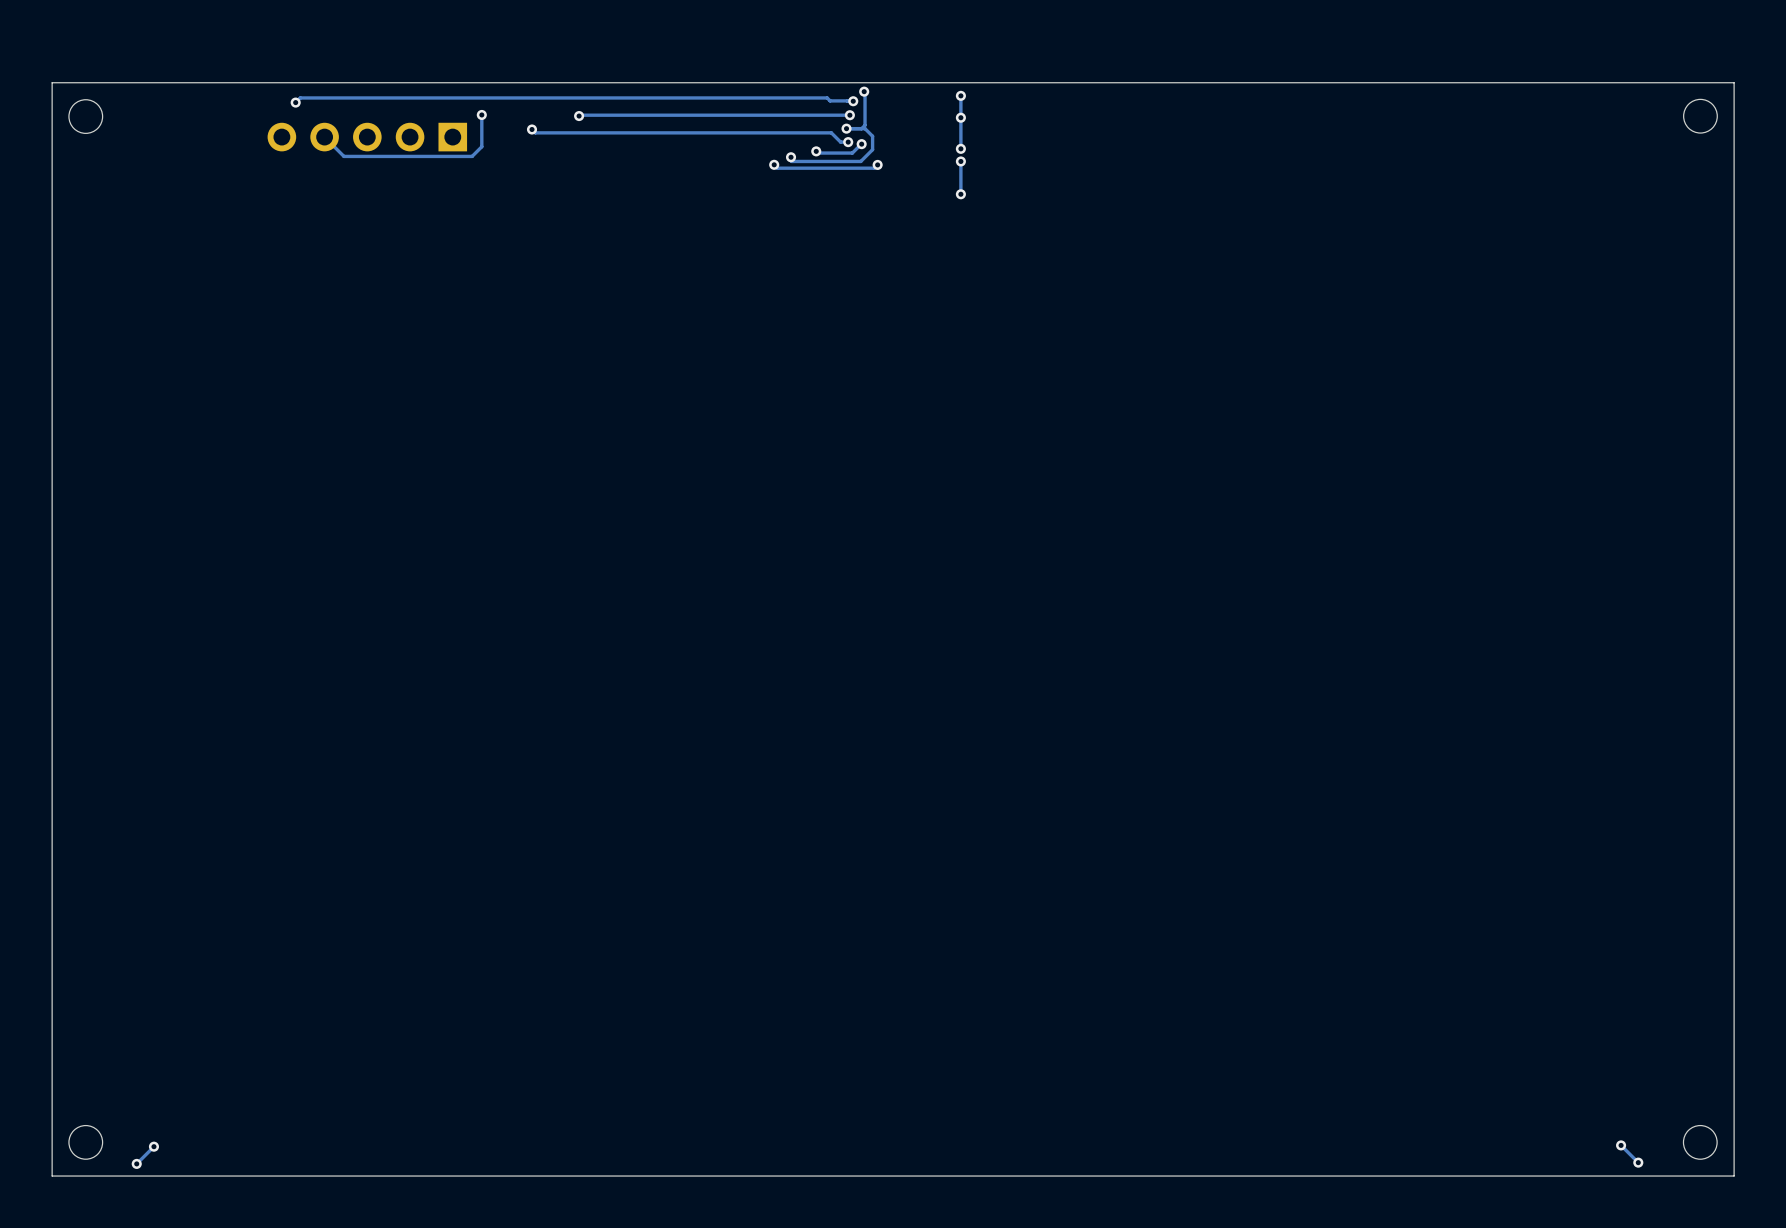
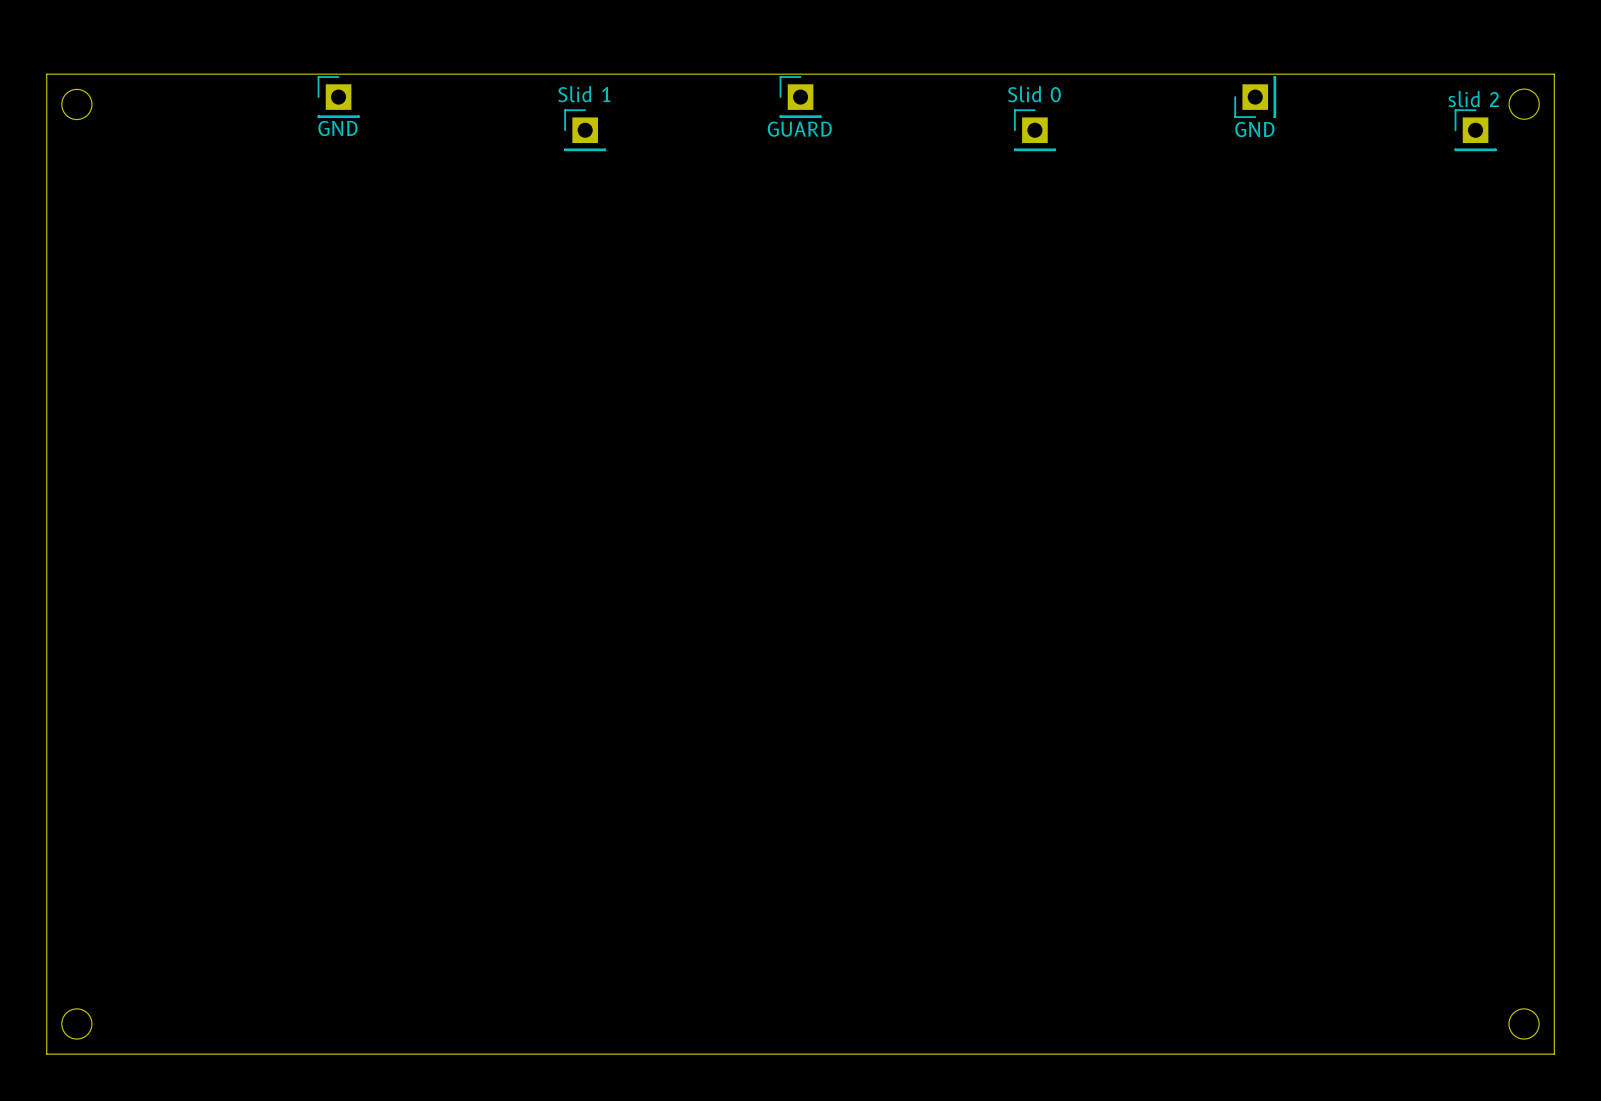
track: (864, 91) (865, 125) (861, 128) -> none
via: (864, 91) -> none
track: (960, 93) (960, 148) -> none
via: (960, 95) -> none
track: (847, 100) (830, 100) (827, 97) (300, 97) (295, 102) -> none
via: (853, 101) -> none
via: (295, 102) -> none
GND: none -> (338, 97)
GUARD: none -> (800, 97)
GND: none -> (1255, 97)
track: (481, 114) (481, 146) (472, 156) (343, 156) (324, 137) -> none
via: (481, 114) -> none
track: (849, 115) (579, 116) -> none
via: (849, 115) -> none
via: (579, 116) -> none
via: (960, 117) -> none
track: (846, 128) (865, 128) (872, 136) (872, 149) (860, 161) (791, 161) (791, 157) -> none
via: (846, 128) -> none
track: (532, 129) (535, 132) (831, 132) (840, 142) (848, 142) -> none
via: (532, 129) -> none
part: (367, 137) -> none
via: (848, 142) -> none
track: (861, 144) (852, 153) (817, 153) (816, 151) -> none
via: (861, 144) -> none
Slid 1: none -> (585, 130)
Slid 0: none -> (1034, 130)
slid 2: none -> (1475, 130)
via: (960, 148) -> none
via: (816, 151) -> none
via: (791, 157) -> none
track: (960, 161) (960, 194) -> none
via: (960, 161) -> none
track: (774, 164) (777, 168) (874, 168) (877, 164) -> none
via: (774, 164) -> none
via: (877, 164) -> none
via: (960, 194) -> none
track: (1621, 1145) (1638, 1162) -> none
via: (1621, 1145) -> none
track: (153, 1146) (136, 1163) -> none
via: (153, 1146) -> none
via: (1638, 1162) -> none
via: (136, 1163) -> none

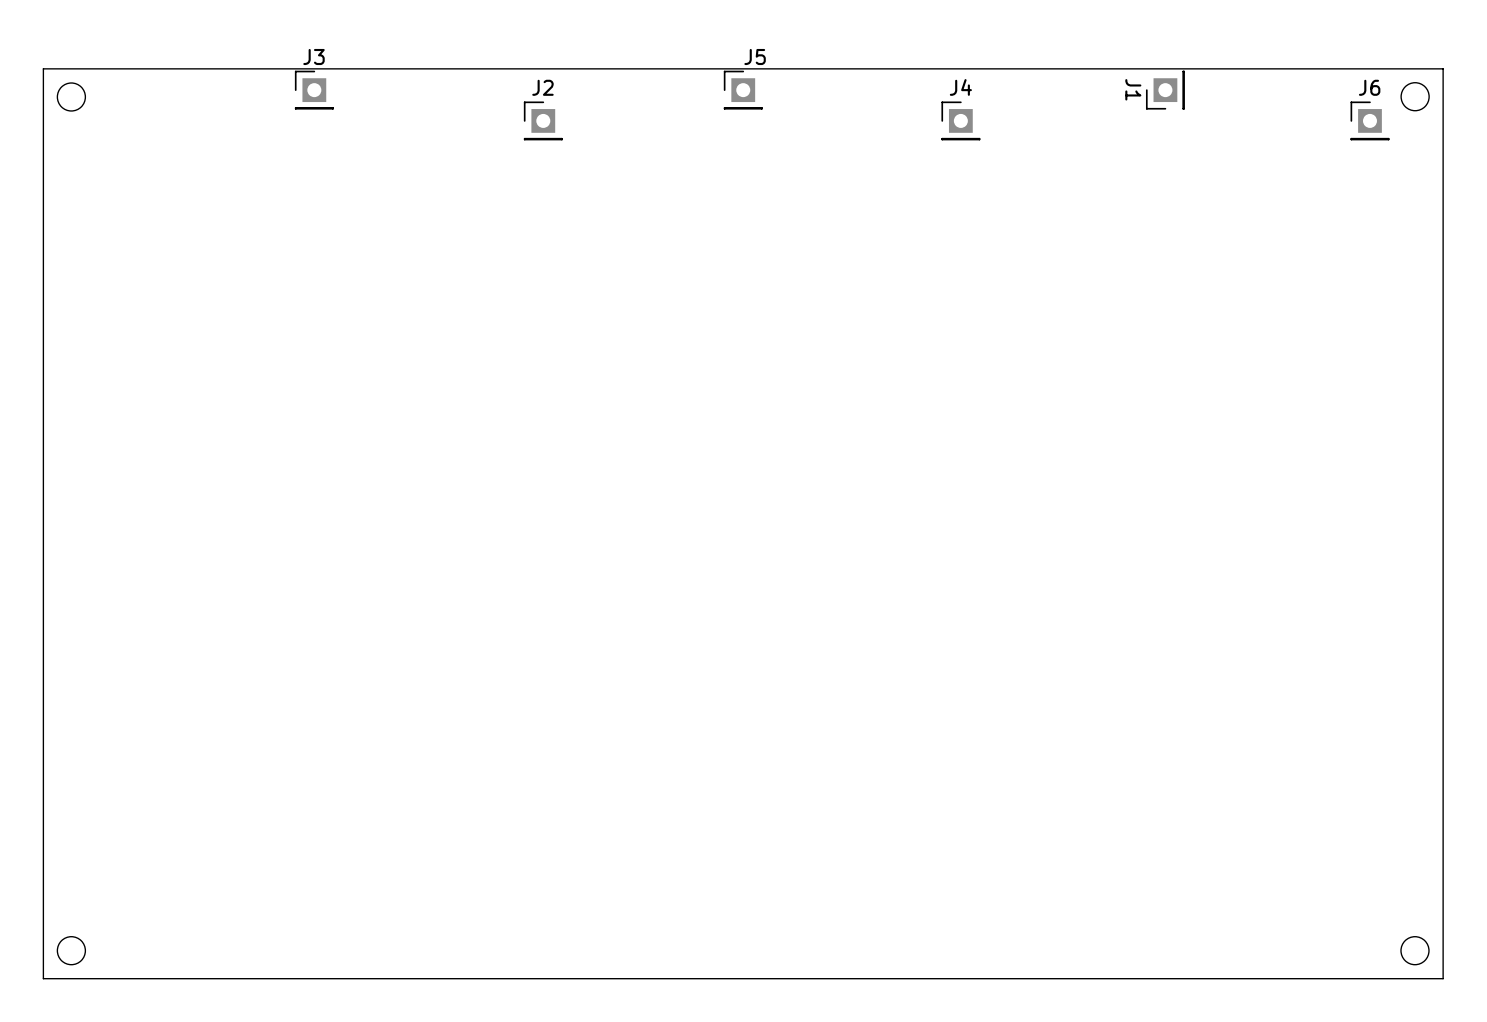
Slid 1 name: Slid 1 (584, 94) -> J2 (542, 87)
Slid 0 name: Slid 0 (1034, 94) -> J4 (960, 87)
slid 2 name: slid 2 (1473, 99) -> J6 (1369, 87)
GND name: GND (337, 128) -> J3 (314, 57)
GUARD name: GUARD (799, 129) -> J5 (755, 57)
GND name: GND (1254, 129) -> J1 (1133, 89)

